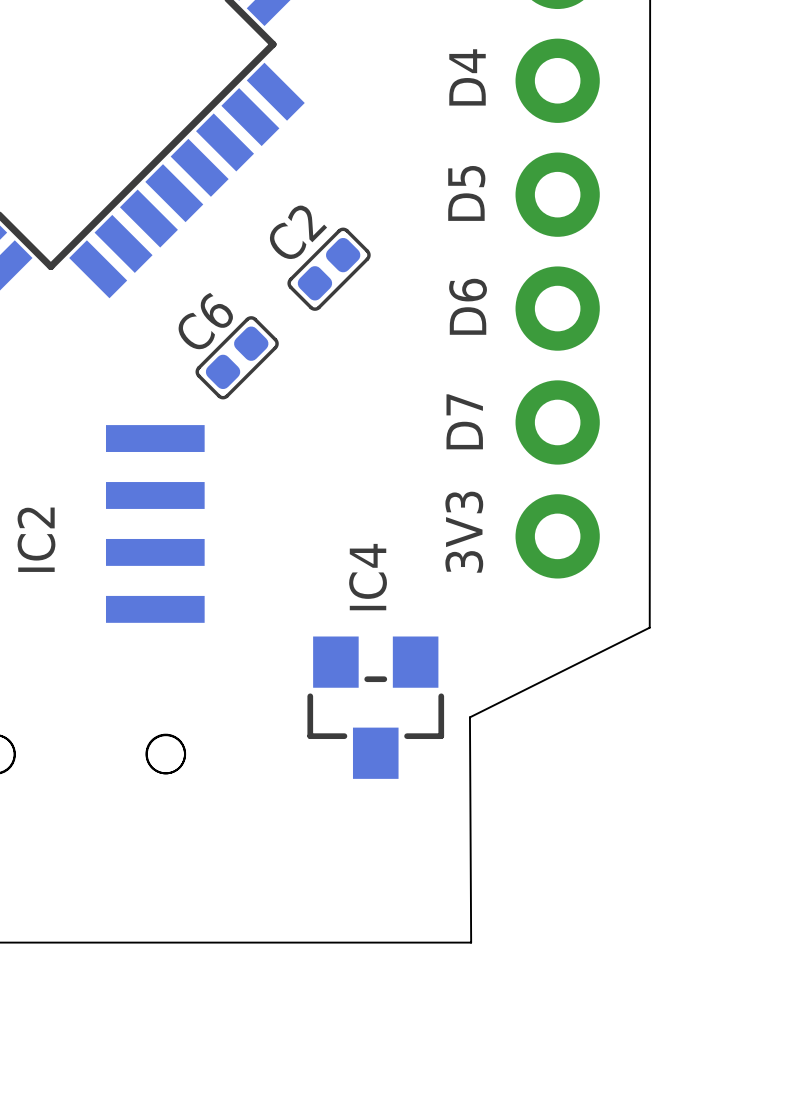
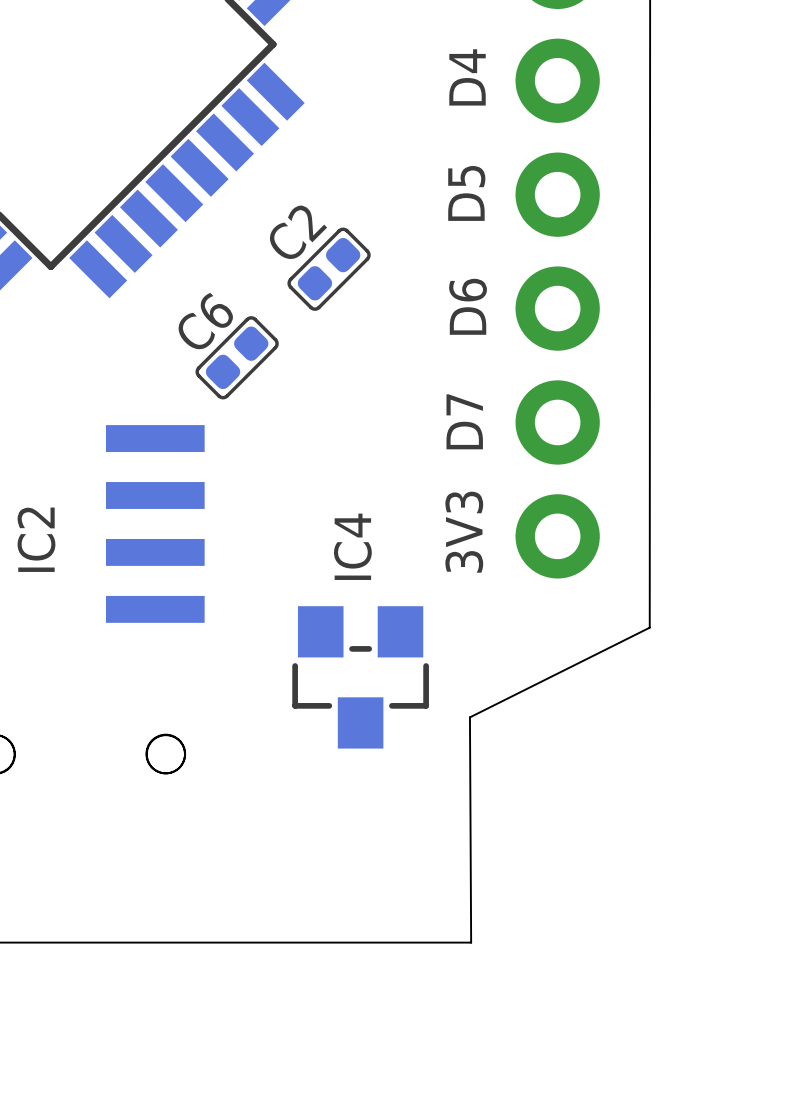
IC4 position: (375, 707) -> (360, 677)

